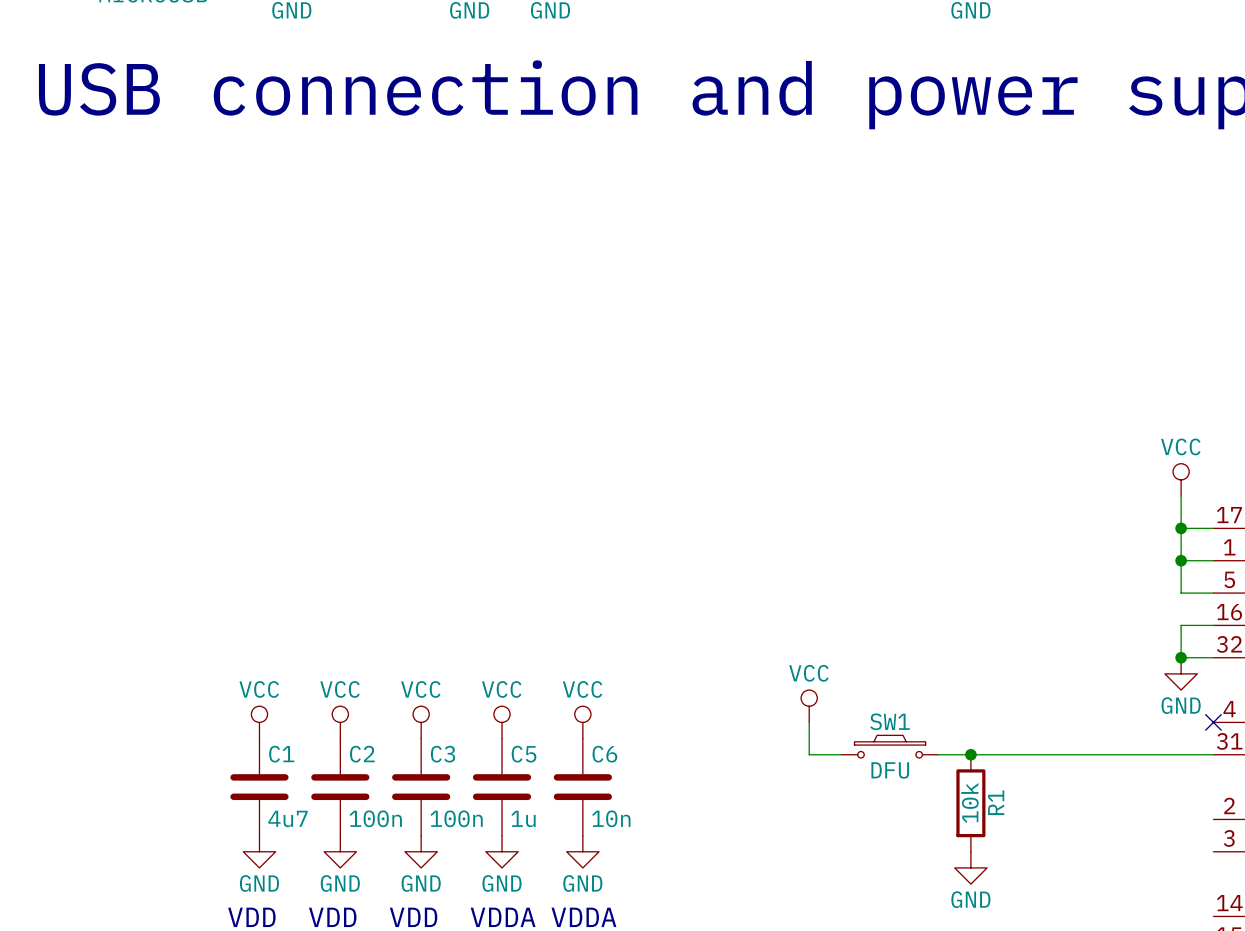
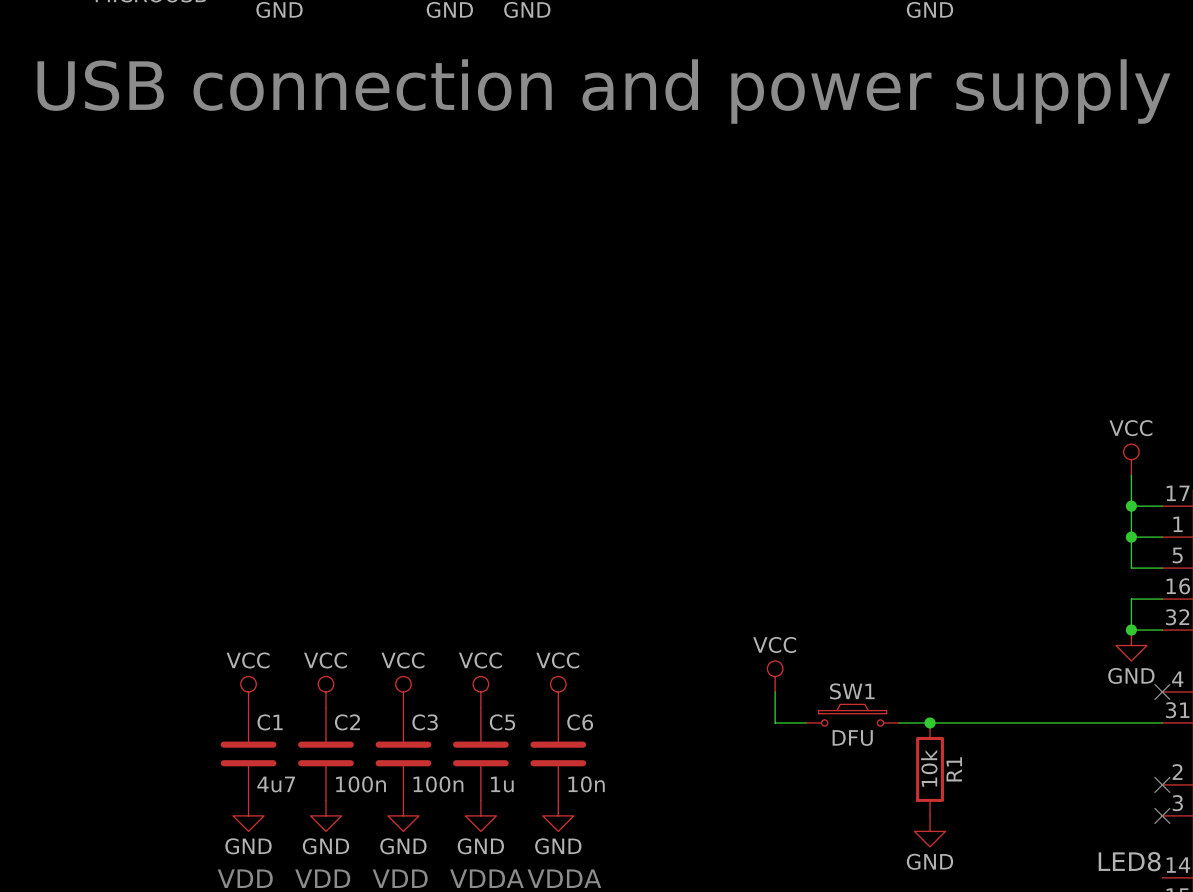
no-connect mark: none -> (1162, 784)
no-connect mark: none -> (1162, 815)
label: none -> LED8 (1129, 861)

